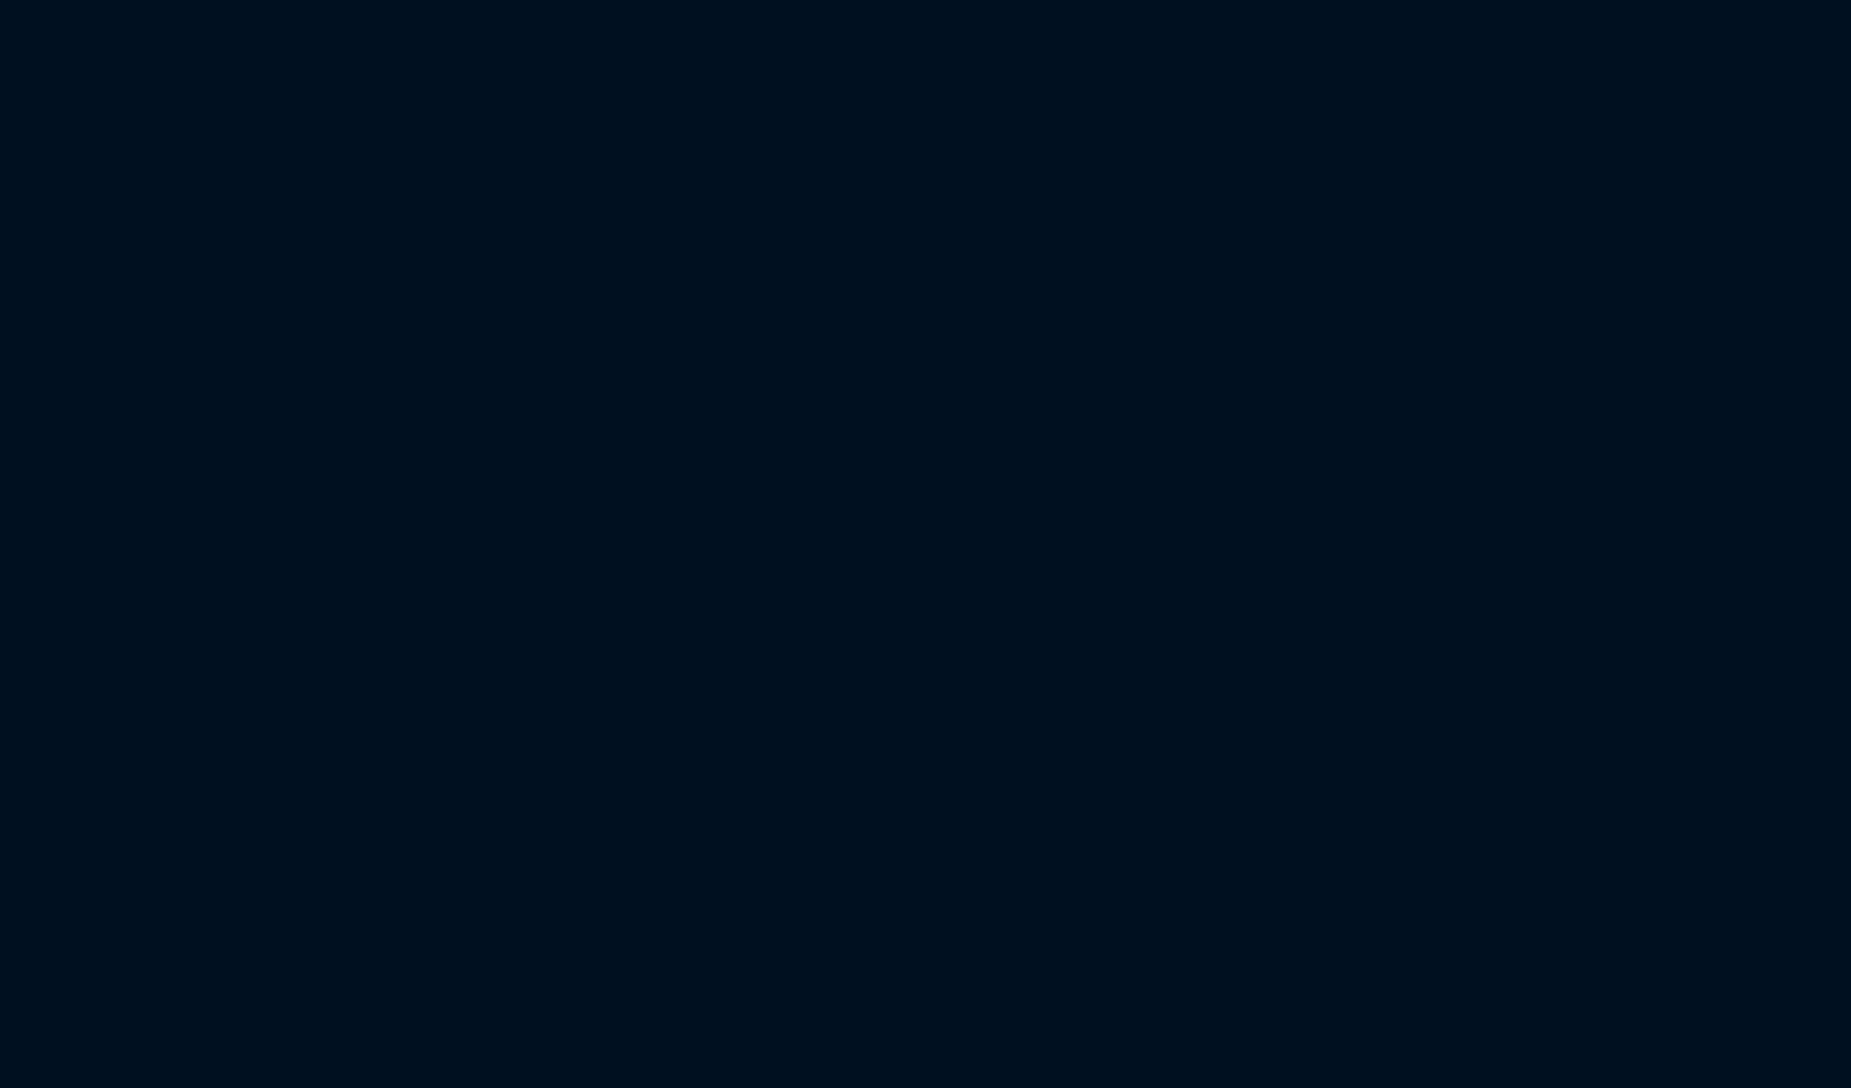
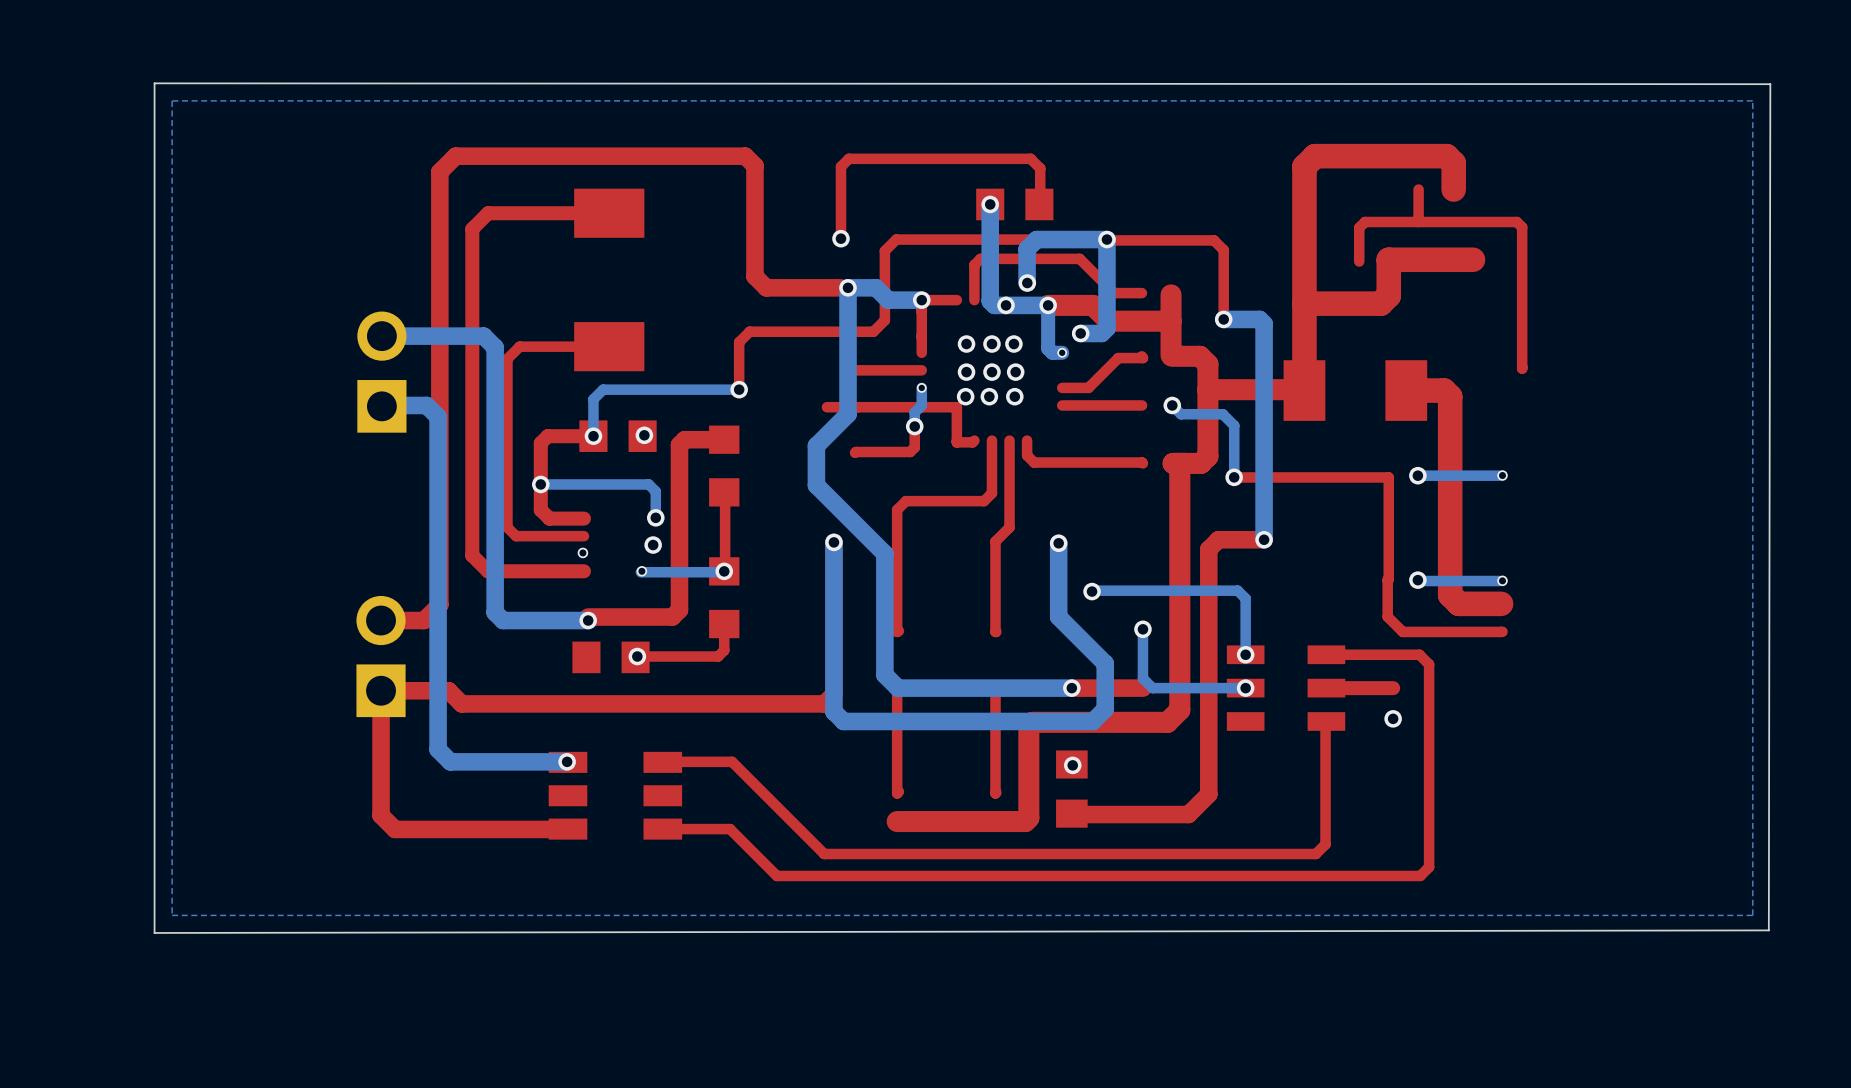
board edge: none -> (154, 83) (1770, 84) (1768, 930) (154, 932) (154, 83)
bottom zone outline: none -> (1752, 100) (172, 100) (172, 915) (1752, 915) (1752, 100)
top track: none -> (1418, 189) (1418, 222)
top track: none -> (1453, 189) (1453, 163) (1446, 156) (1315, 156) (1304, 166) (1304, 389)
bottom track: none -> (990, 204) (990, 301) (994, 305) (1048, 305) (1048, 348) (1052, 352) (1062, 352)
via: none -> (990, 204)
part: none -> (1014, 204)
top track: none -> (1039, 204) (1040, 168) (1030, 158) (848, 158) (840, 166) (840, 238)
top track: none -> (609, 214) (488, 213) (472, 229) (472, 555) (488, 571) (584, 572)
via: none -> (840, 238)
via: none -> (1106, 239)
top track: none -> (1388, 259) (1388, 295) (1380, 303) (1304, 303)
top track: none -> (1388, 259) (1473, 259) (1474, 261)
top track: none -> (1359, 261) (1359, 227) (1365, 222) (1516, 222) (1522, 227) (1522, 367)
part: none -> (609, 279)
bottom track: none -> (1027, 282) (1027, 249) (1036, 239) (1106, 239) (1106, 328) (1101, 333) (1080, 333)
via: none -> (1027, 283)
top track: none -> (840, 287) (766, 287) (754, 276) (754, 165) (745, 156) (455, 156) (439, 171) (439, 604) (424, 620) (378, 620)
via: none -> (848, 287)
top track: none -> (1141, 293) (1113, 293) (1079, 258) (980, 258) (974, 265) (974, 300)
top track: none -> (1172, 293) (1171, 355) (1200, 356) (1207, 364) (1207, 456) (1200, 463) (1173, 463)
bottom track: none -> (921, 300) (888, 300) (876, 287) (848, 287) (848, 414) (816, 445) (816, 485) (884, 553) (884, 674) (898, 688) (1071, 688)
via: none -> (921, 300)
top track: none -> (956, 300) (921, 300) (921, 352)
via: none -> (1006, 305)
top track: none -> (1048, 305) (1092, 305) (1108, 321) (1171, 321)
via: none -> (1048, 305)
top track: none -> (1223, 319) (1223, 250) (1214, 240) (896, 239) (884, 250) (884, 320) (873, 331) (749, 331) (739, 342) (739, 389)
bottom track: none -> (1223, 319) (1259, 319) (1264, 323) (1264, 539)
via: none -> (1223, 319)
via: none -> (1080, 333)
bottom track: none -> (379, 336) (483, 336) (495, 347) (495, 612) (503, 620) (588, 620)
via: none -> (966, 344)
via: none -> (991, 344)
via: none -> (1013, 344)
top track: none -> (609, 346) (519, 346) (507, 358) (507, 527) (516, 536) (583, 536)
via: none -> (1062, 352)
top track: none -> (1141, 356) (1142, 358) (1118, 358) (1088, 387) (1062, 387)
top track: none -> (921, 370) (854, 370)
part: none -> (381, 372)
via: none -> (966, 372)
via: none -> (991, 372)
via: none -> (1015, 372)
bottom track: none -> (921, 387) (921, 405) (914, 412) (914, 426)
via: none -> (921, 387)
bottom track: none -> (739, 389) (603, 389) (593, 399) (593, 436)
via: none -> (739, 389)
top track: none -> (1304, 389) (1207, 389)
top track: none -> (1409, 389) (1406, 390) (1444, 390) (1450, 396) (1450, 595) (1458, 603) (1502, 603)
part: none -> (1355, 390)
via: none -> (965, 396)
via: none -> (989, 396)
via: none -> (1014, 396)
top track: none -> (1142, 405) (1062, 405)
bottom track: none -> (1172, 405) (1181, 414) (1222, 414) (1234, 425) (1234, 477)
via: none -> (1172, 405)
bottom track: none -> (379, 406) (426, 405) (438, 416) (438, 749) (450, 761) (567, 762)
top track: none -> (826, 407) (956, 407) (956, 442) (972, 442) (974, 440)
top track: none -> (914, 426) (914, 447) (910, 451) (855, 452)
via: none -> (914, 426)
via: none -> (644, 435)
top track: none -> (593, 436) (547, 436) (540, 443) (540, 509) (549, 518) (583, 518)
via: none -> (593, 436)
part: none -> (618, 436)
top track: none -> (724, 439) (684, 439) (679, 444) (679, 609) (672, 617) (588, 617)
top track: none -> (991, 440) (991, 493) (984, 501) (905, 501) (897, 509) (897, 631) (898, 631)
top track: none -> (1009, 440) (1009, 527) (995, 541) (996, 631)
top track: none -> (1027, 440) (1027, 455) (1034, 462) (1142, 463)
top track: none -> (1185, 463) (1179, 468) (1179, 710) (1167, 722) (1032, 722) (1028, 725) (1028, 818) (1025, 821) (996, 822)
part: none -> (724, 466)
via: none -> (1417, 475)
bottom track: none -> (1499, 475) (1417, 475)
via: none -> (1502, 475)
top track: none -> (1234, 477) (1388, 477) (1387, 580)
via: none -> (1234, 477)
bottom track: none -> (540, 484) (648, 484) (655, 491) (655, 517)
via: none -> (540, 484)
top track: none -> (724, 492) (724, 571)
via: none -> (655, 517)
top track: none -> (1264, 539) (1218, 539) (1208, 549) (1208, 794) (1188, 814) (1071, 813)
via: none -> (1264, 539)
top track: none -> (833, 542) (833, 694) (824, 703) (461, 703) (448, 690) (383, 690) (381, 693) (381, 815) (395, 829) (567, 829)
bottom track: none -> (833, 542) (833, 711) (843, 721) (1092, 721) (1105, 709) (1105, 663) (1058, 617) (1058, 543)
via: none -> (833, 542)
via: none -> (1058, 543)
via: none -> (653, 545)
via: none -> (582, 552)
via: none -> (641, 571)
bottom track: none -> (724, 571) (640, 572)
via: none -> (724, 571)
top track: none -> (1387, 580) (1387, 616) (1402, 631) (1502, 631)
bottom track: none -> (1417, 580) (1499, 581)
via: none -> (1417, 580)
via: none -> (1502, 580)
bottom track: none -> (1092, 591) (1237, 590) (1245, 598) (1245, 654)
via: none -> (1092, 591)
part: none -> (724, 597)
via: none -> (588, 620)
top track: none -> (724, 624) (724, 650) (718, 656) (635, 657)
bottom track: none -> (1142, 629) (1142, 678) (1152, 688) (1245, 688)
via: none -> (1142, 629)
via: none -> (1245, 654)
top track: none -> (1326, 654) (1419, 654) (1429, 664) (1429, 867) (1420, 875) (776, 875) (730, 829) (661, 828)
part: none -> (381, 656)
via: none -> (637, 656)
part: none -> (611, 657)
top track: none -> (898, 683) (897, 684) (897, 793) (898, 791)
top track: none -> (1143, 686) (1142, 688) (1071, 688)
top track: none -> (996, 688) (996, 792)
via: none -> (1071, 688)
via: none -> (1245, 688)
part: none -> (1286, 688)
top track: none -> (1393, 688) (1326, 688)
via: none -> (1393, 718)
top track: none -> (1326, 721) (1325, 844) (1315, 854) (824, 854) (732, 761) (662, 762)
via: none -> (567, 761)
via: none -> (1072, 765)
part: none -> (1071, 789)
part: none -> (615, 795)
top track: none -> (995, 821) (897, 821) (898, 821)

